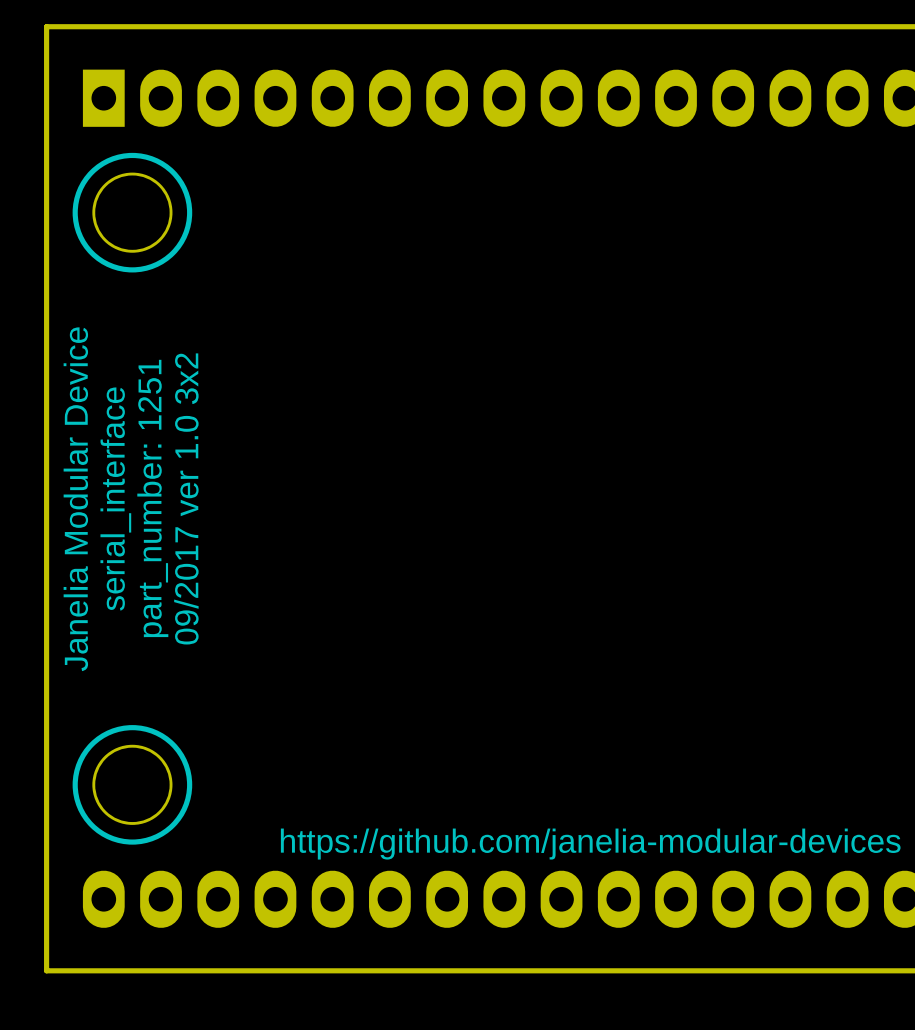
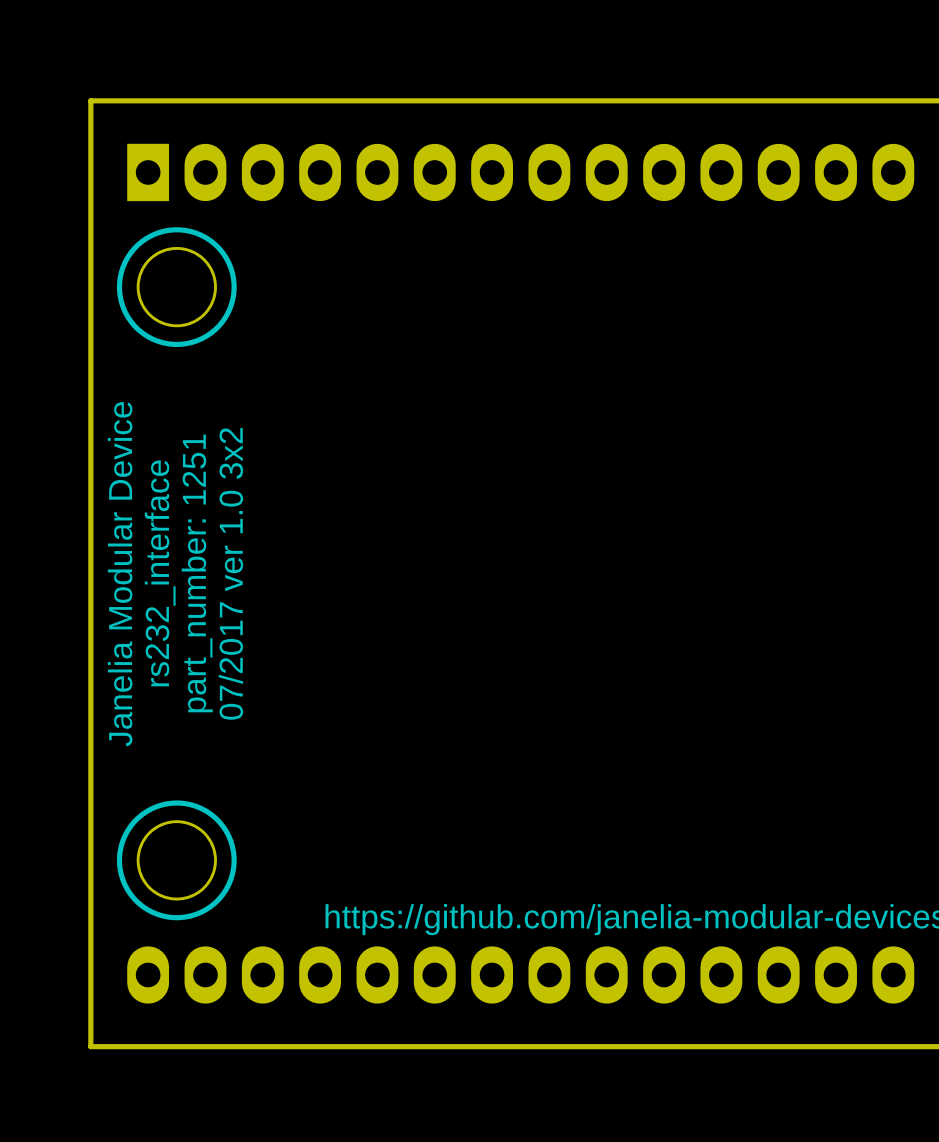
text: 09/2017 ver 1.0 3x2 (186, 498) -> 07/2017 ver 1.0 3x2 (230, 573)
text: serial_interface (115, 499) -> rs232_interface (160, 573)

